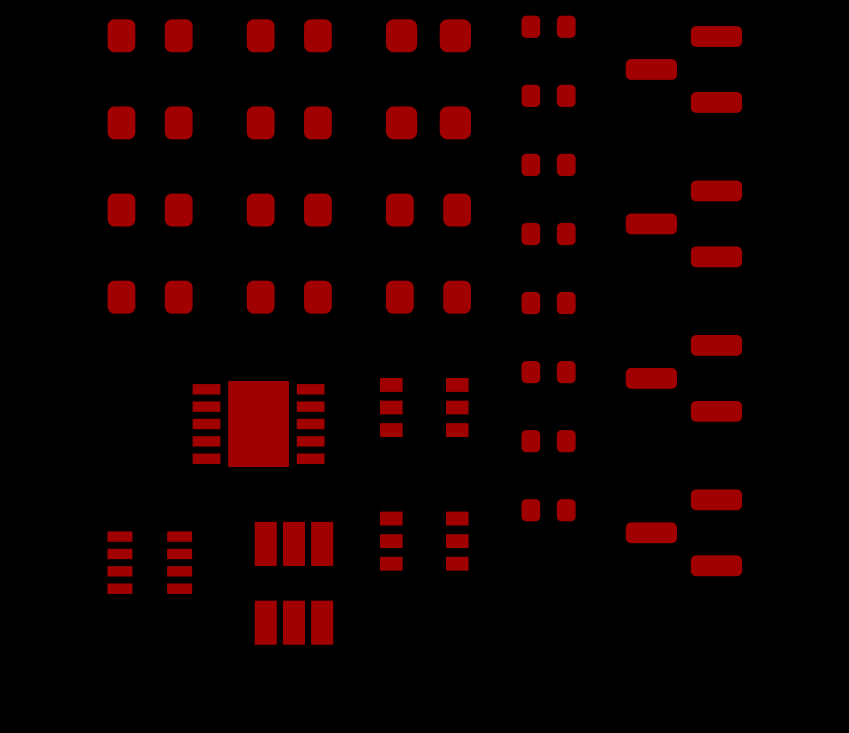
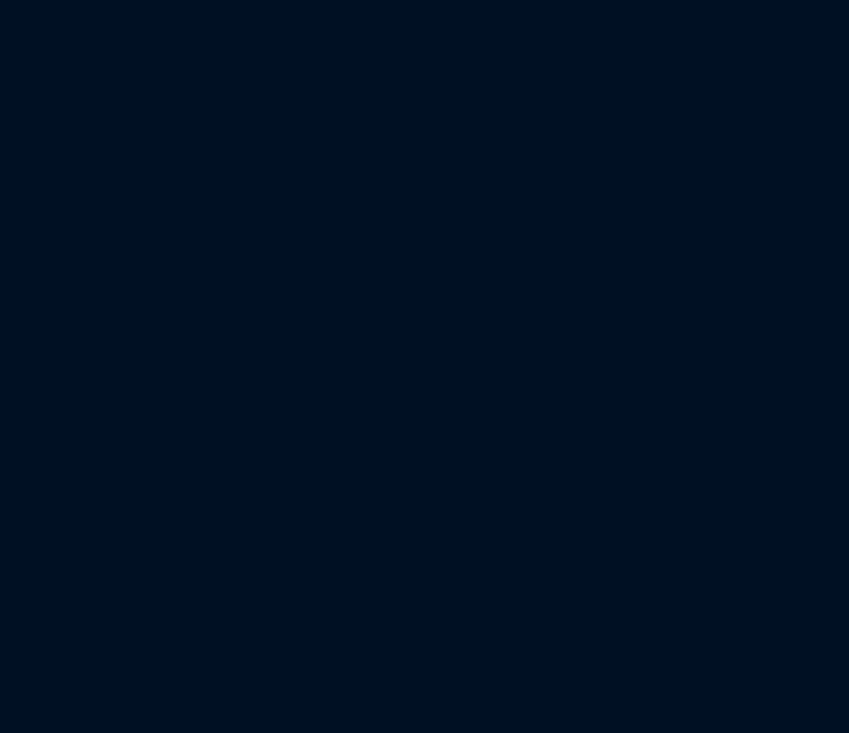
part: (548, 26) -> none
part: (150, 35) -> none
part: (289, 35) -> none
part: (428, 35) -> none
part: (683, 69) -> none
part: (548, 95) -> none
part: (150, 122) -> none
part: (289, 122) -> none
part: (428, 122) -> none
part: (548, 164) -> none
part: (150, 210) -> none
part: (289, 210) -> none
part: (428, 210) -> none
part: (683, 223) -> none
part: (548, 233) -> none
part: (150, 297) -> none
part: (289, 297) -> none
part: (428, 297) -> none
part: (548, 303) -> none
part: (548, 372) -> none
part: (683, 378) -> none
part: (424, 407) -> none
part: (258, 424) -> none
part: (548, 441) -> none
part: (548, 510) -> none
part: (683, 532) -> none
part: (424, 541) -> none
part: (293, 543) -> none
part: (149, 562) -> none
part: (293, 622) -> none

